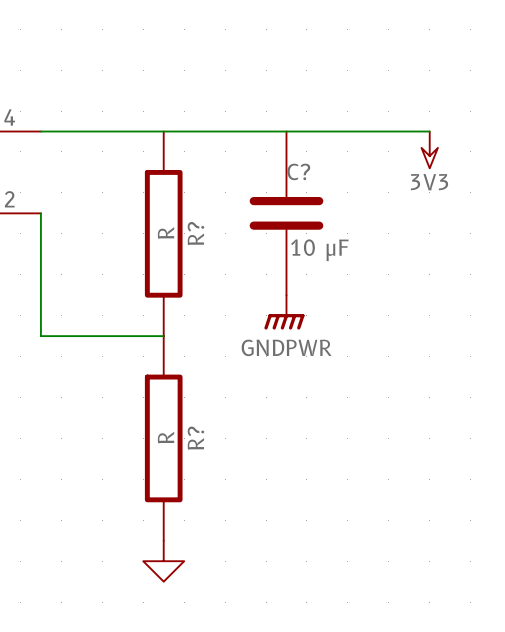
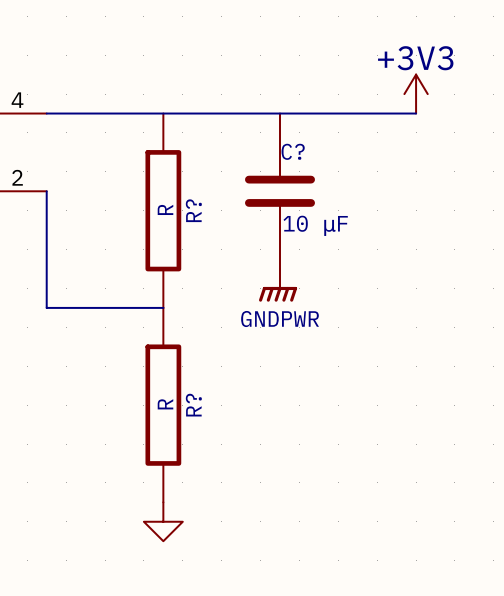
power symbol: none -> +3V3 (416, 94)
power symbol: 3V3 (429, 149) -> none

